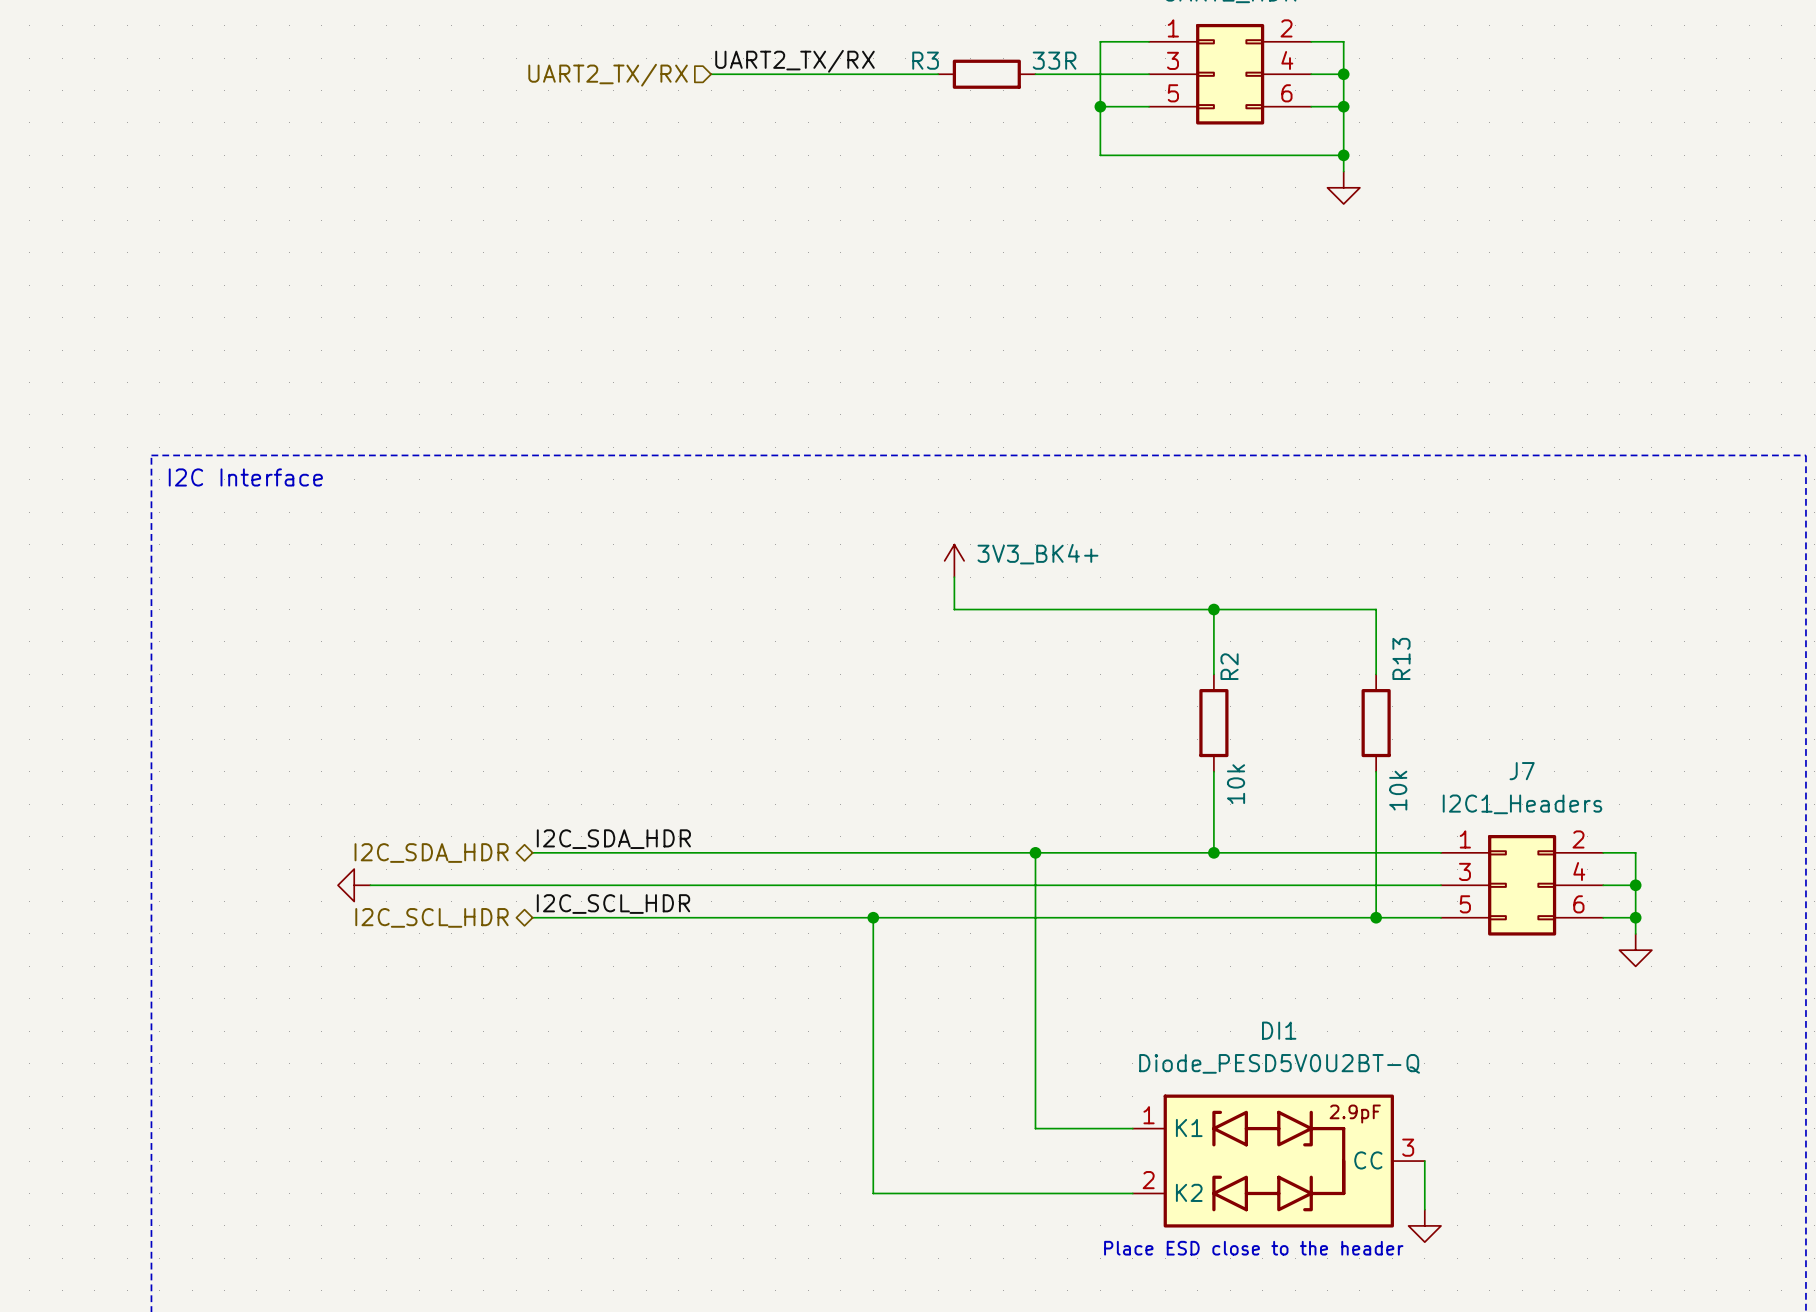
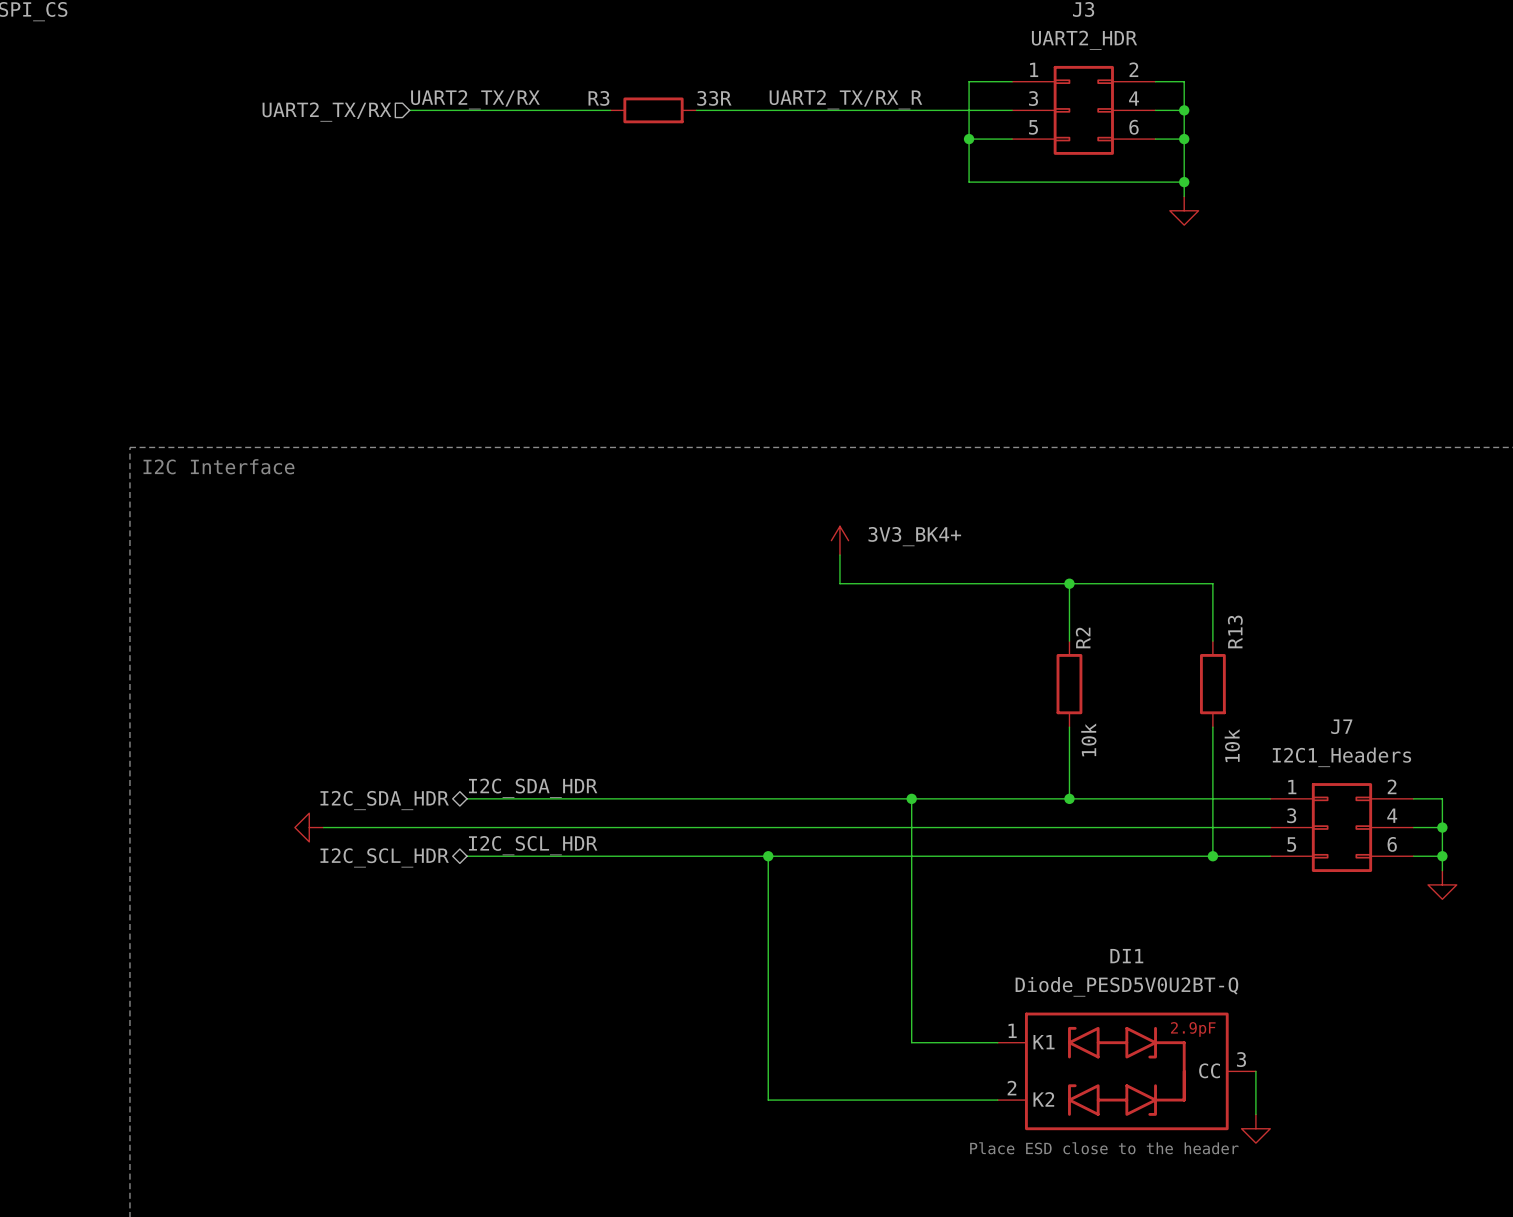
label position: UART2_TX/RX (795, 61) -> UART2_TX/RX (475, 99)
label: none -> UART2_TX/RX_R (845, 99)
wire: none -> (409, 110) (610, 110)
wire: (711, 74) (792, 74) -> none
wire: none -> (825, 110) (911, 110)
R3 position: (986, 74) -> (653, 110)
hierarchical label position: UART2_TX/RX (608, 75) -> UART2_TX/RX (326, 112)

